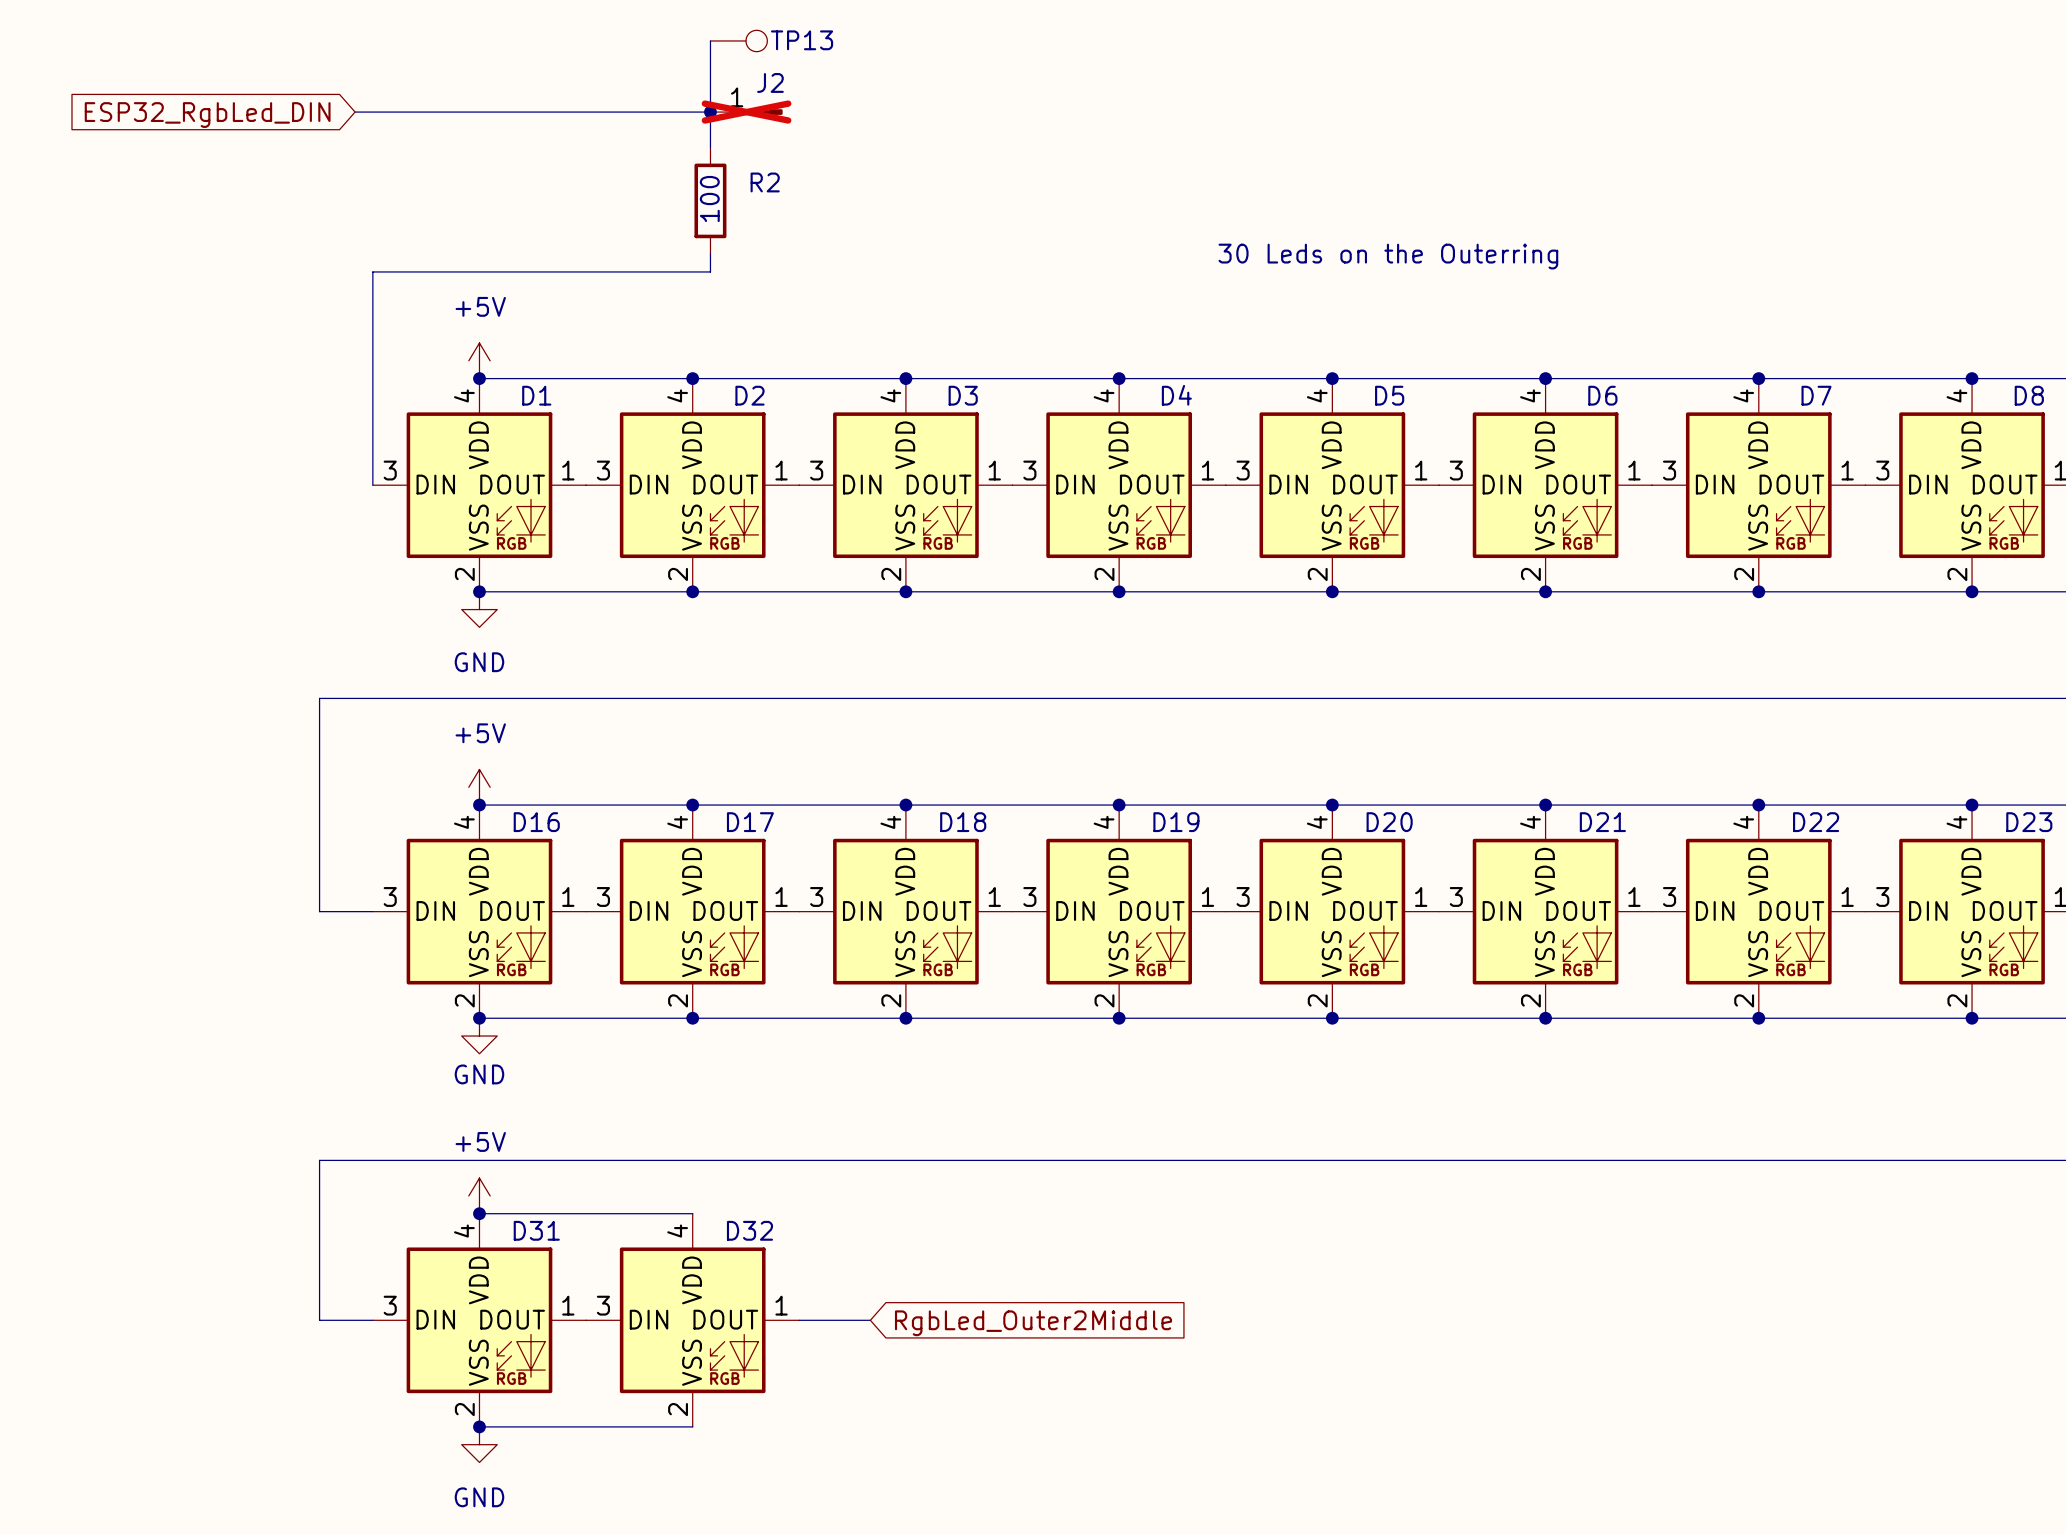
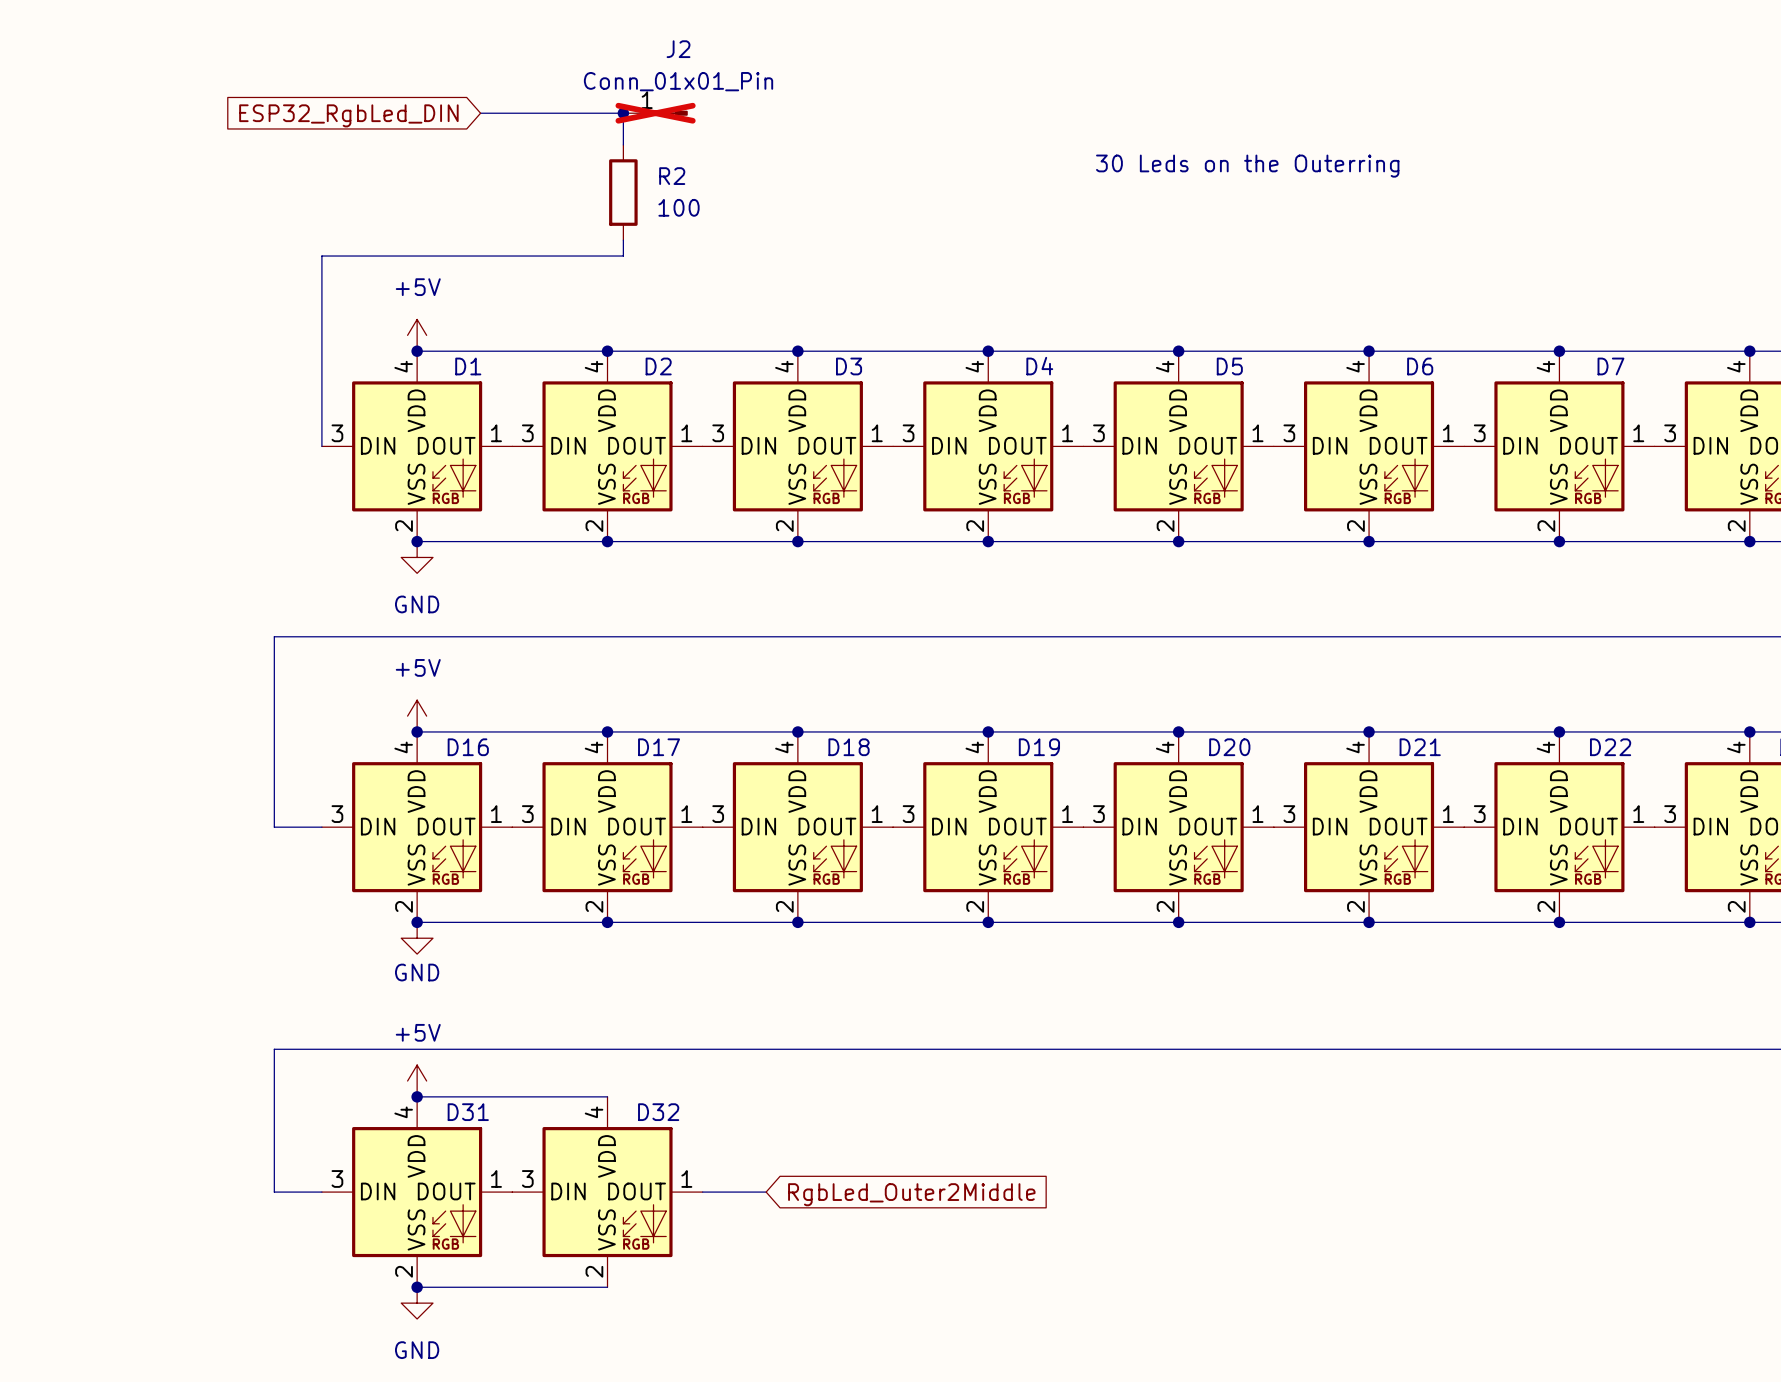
wire: (710, 40) (710, 112) -> none
TP13: (738, 40) -> none
J2 value: none -> Conn_01x01_Pin (678, 81)
J2 name position: J2 (770, 82) -> J2 (678, 49)
wire: (355, 112) (550, 112) -> none
global label position: ESP32_RgbLed_DIN (207, 115) -> ESP32_RgbLed_DIN (348, 115)
R2 value rotation: 0° (709, 198) -> 90° clockwise (679, 207)
R2 value position: 100 (709, 198) -> 100 (679, 207)
text position: 30 Leds on the Outerring (1388, 256) -> 30 Leds on the Outerring (1247, 166)

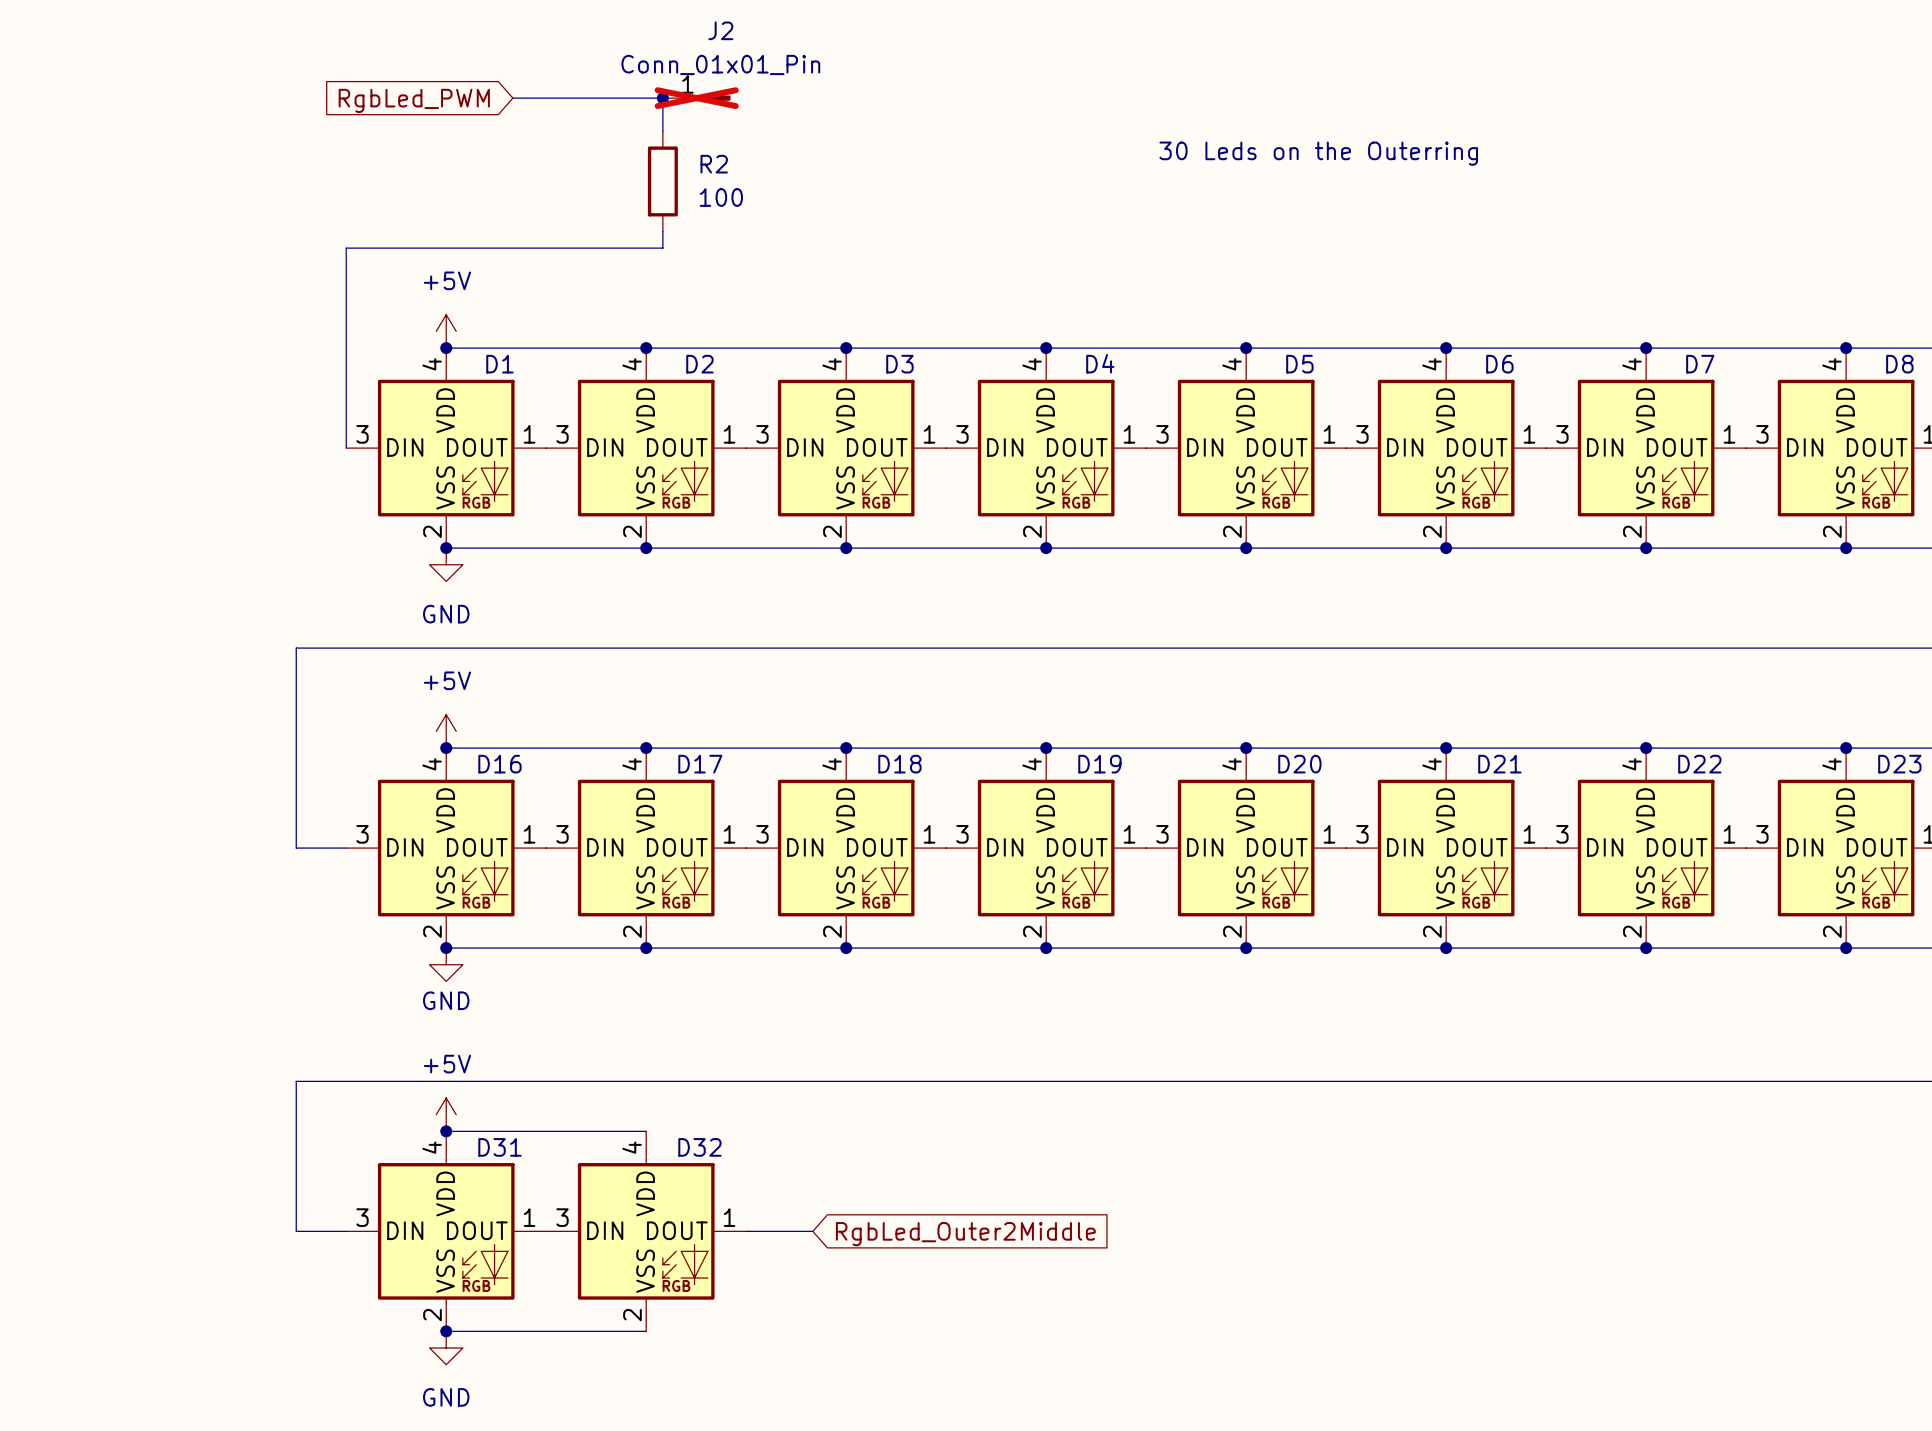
global label: ESP32_RgbLed_DIN (348, 115) -> RgbLed_PWM (414, 100)

